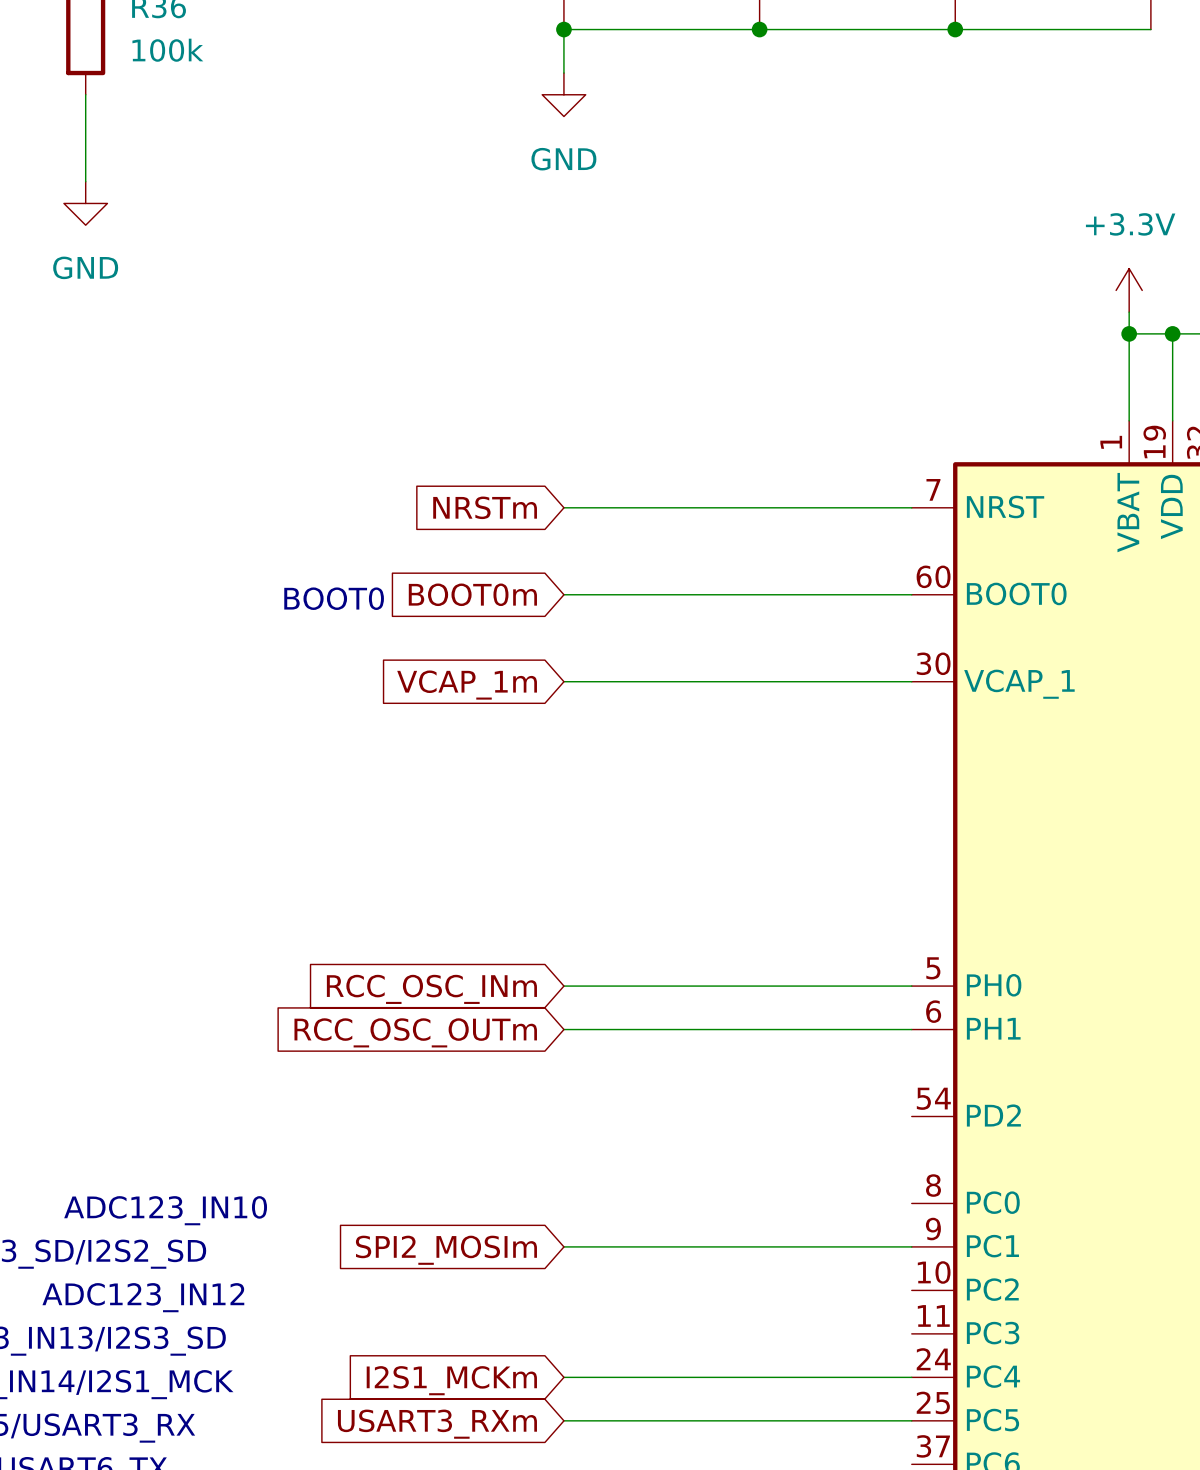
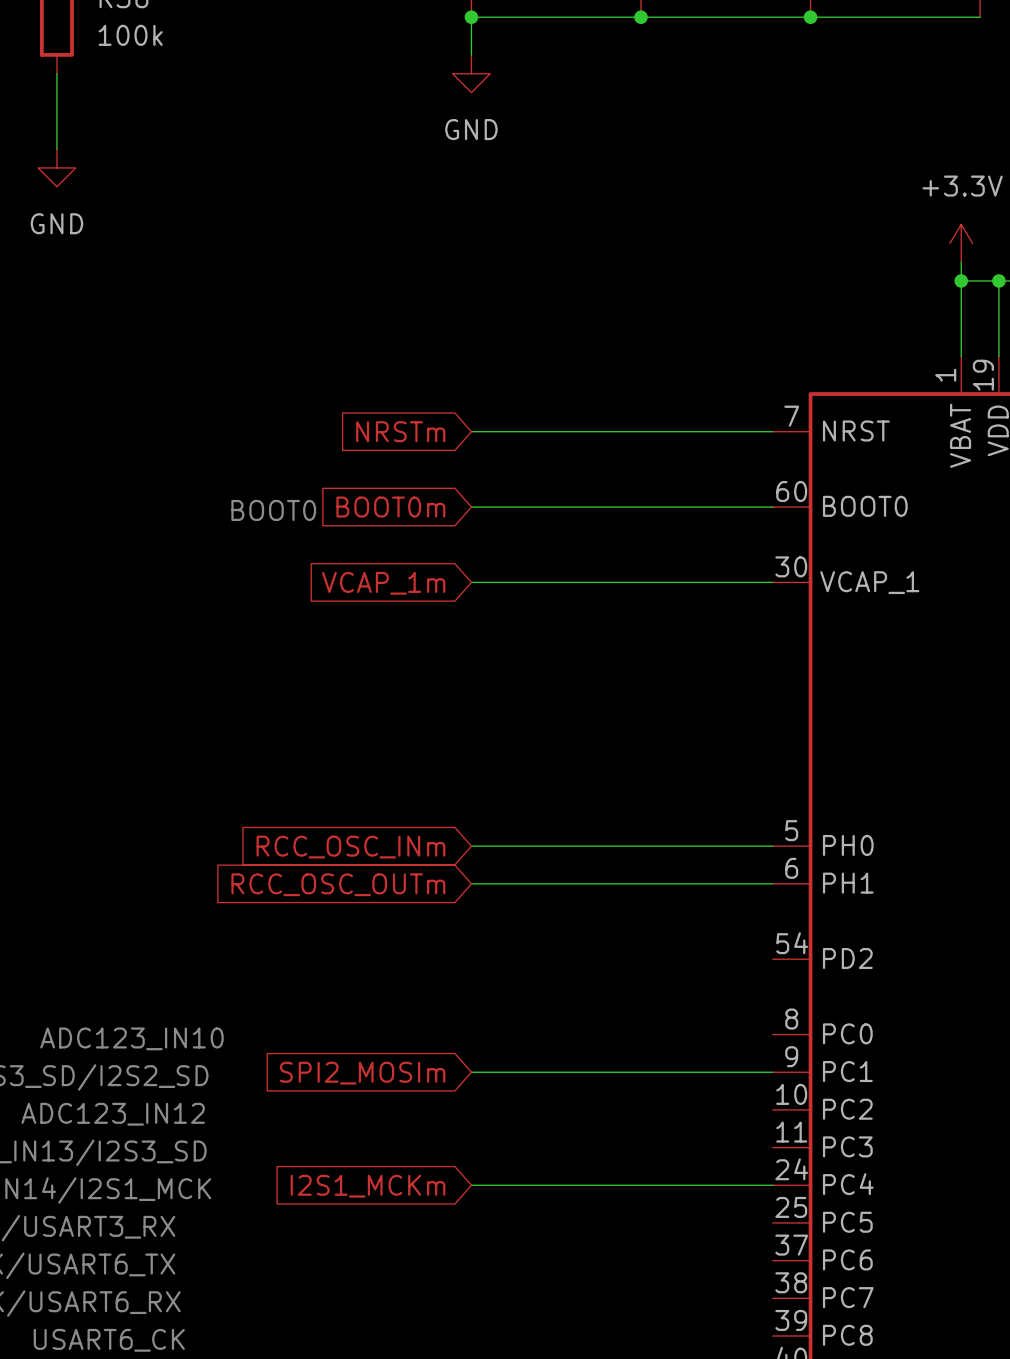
wire: (563, 1420) (911, 1420) -> none
global label: USART3_RXm (437, 1424) -> none

